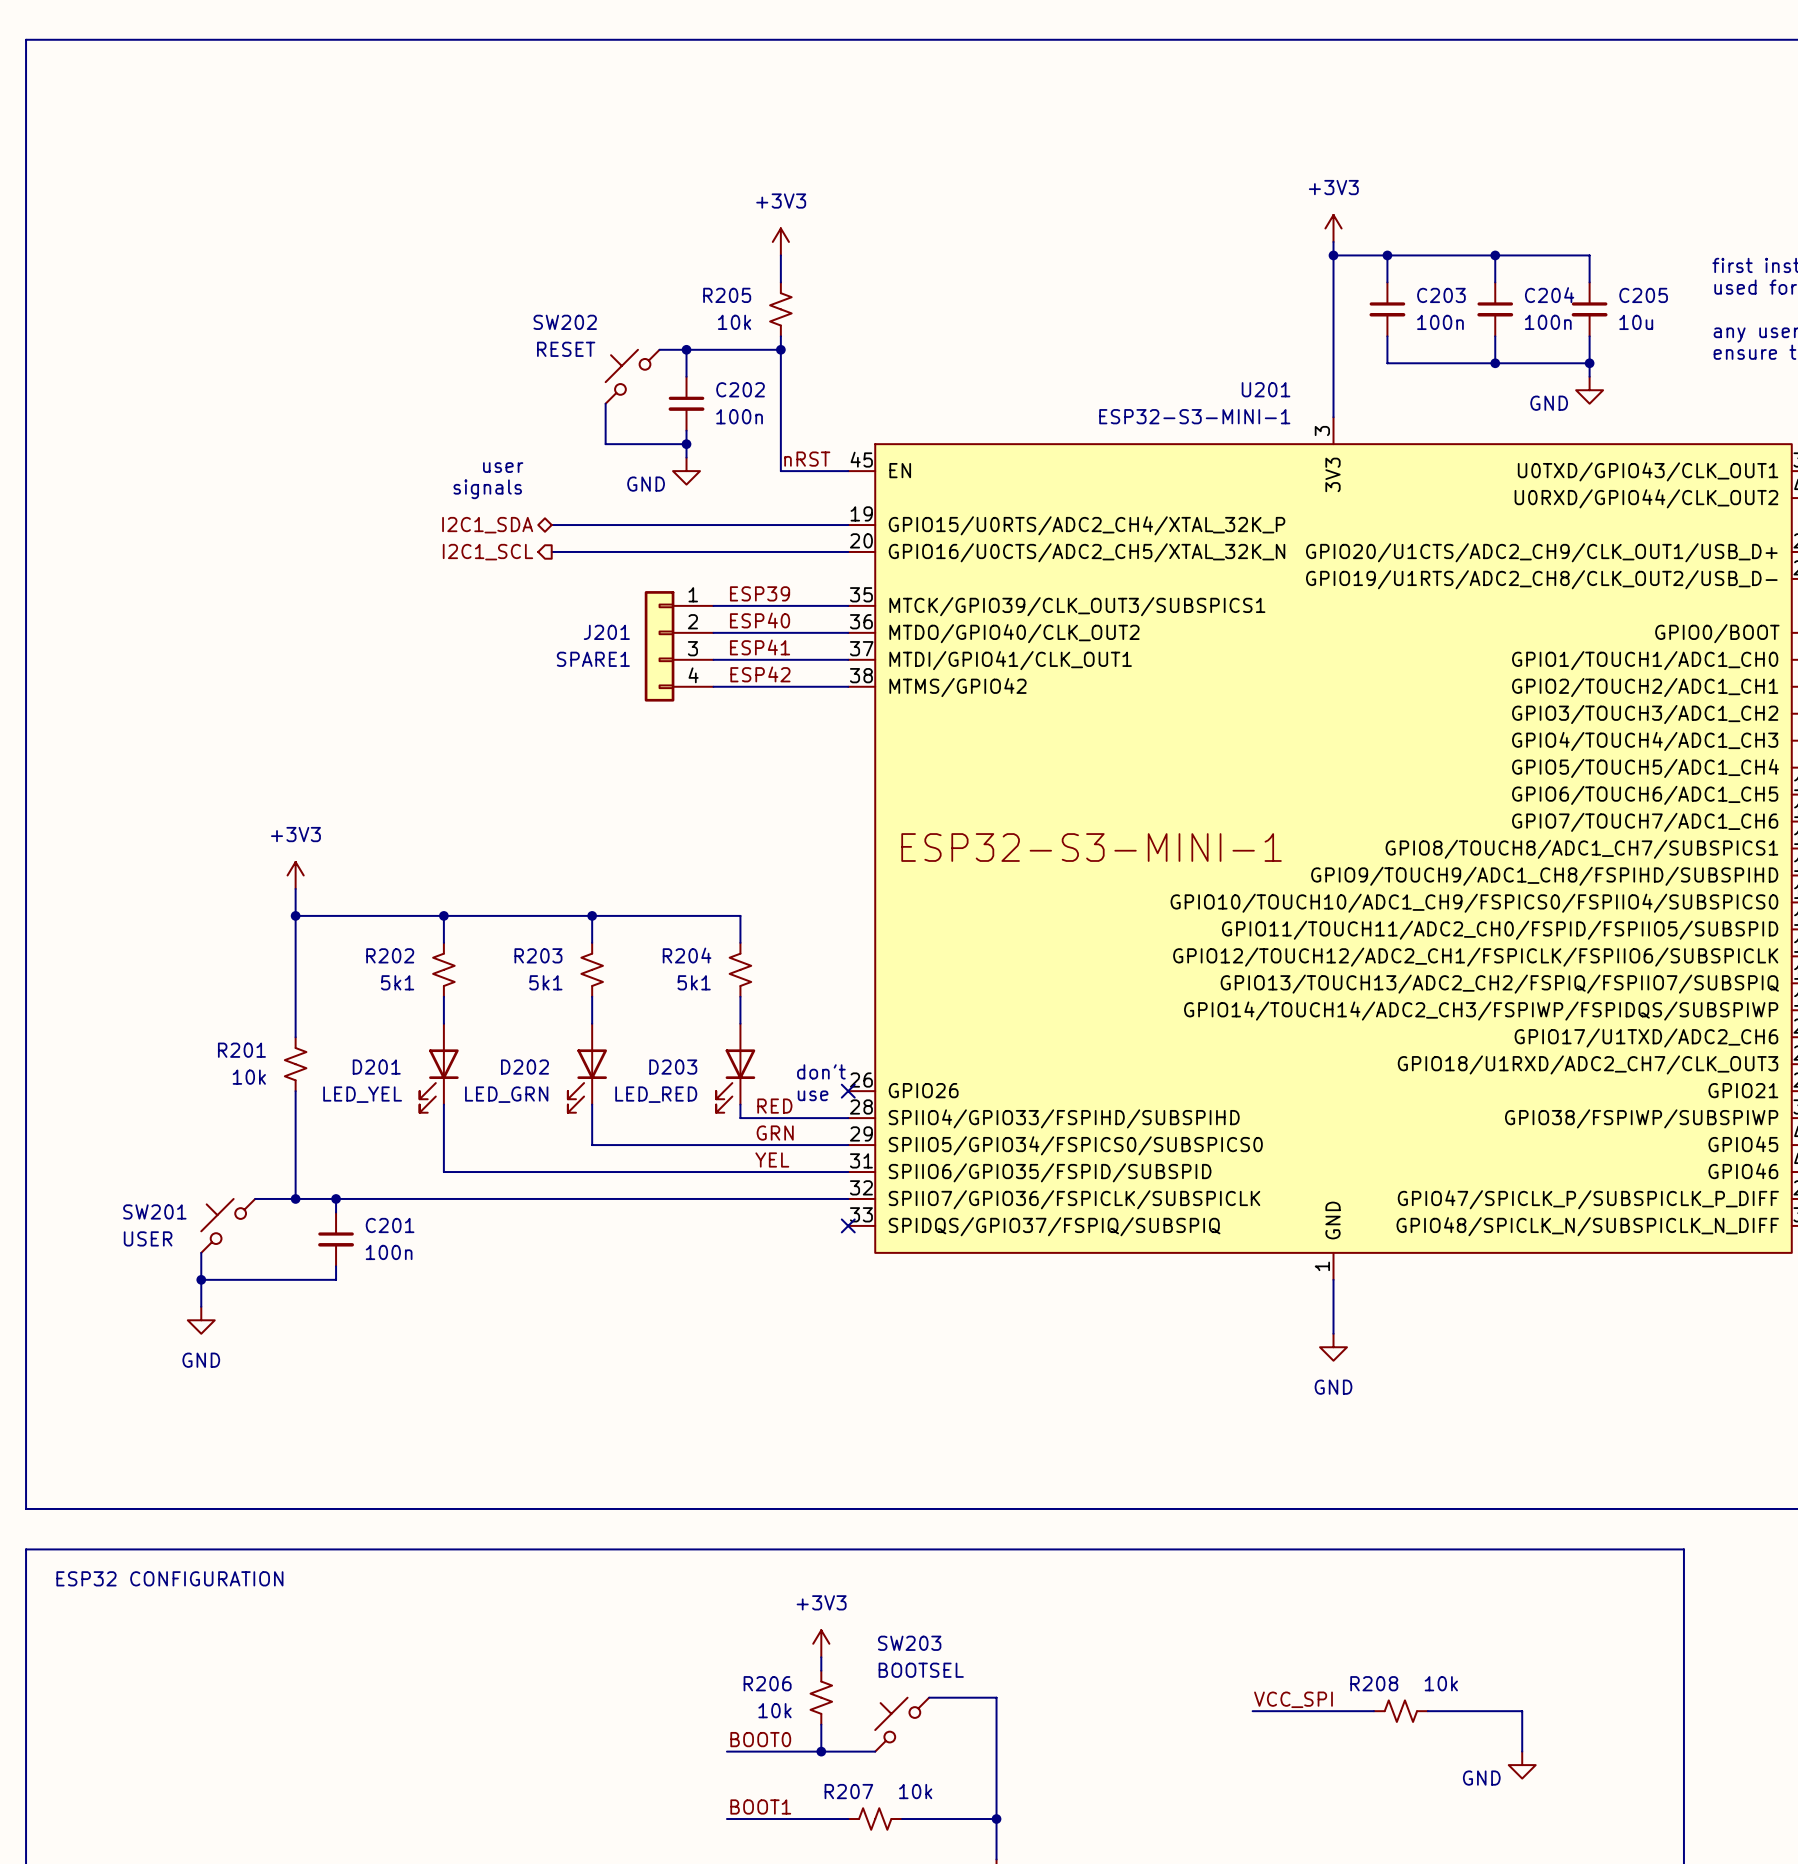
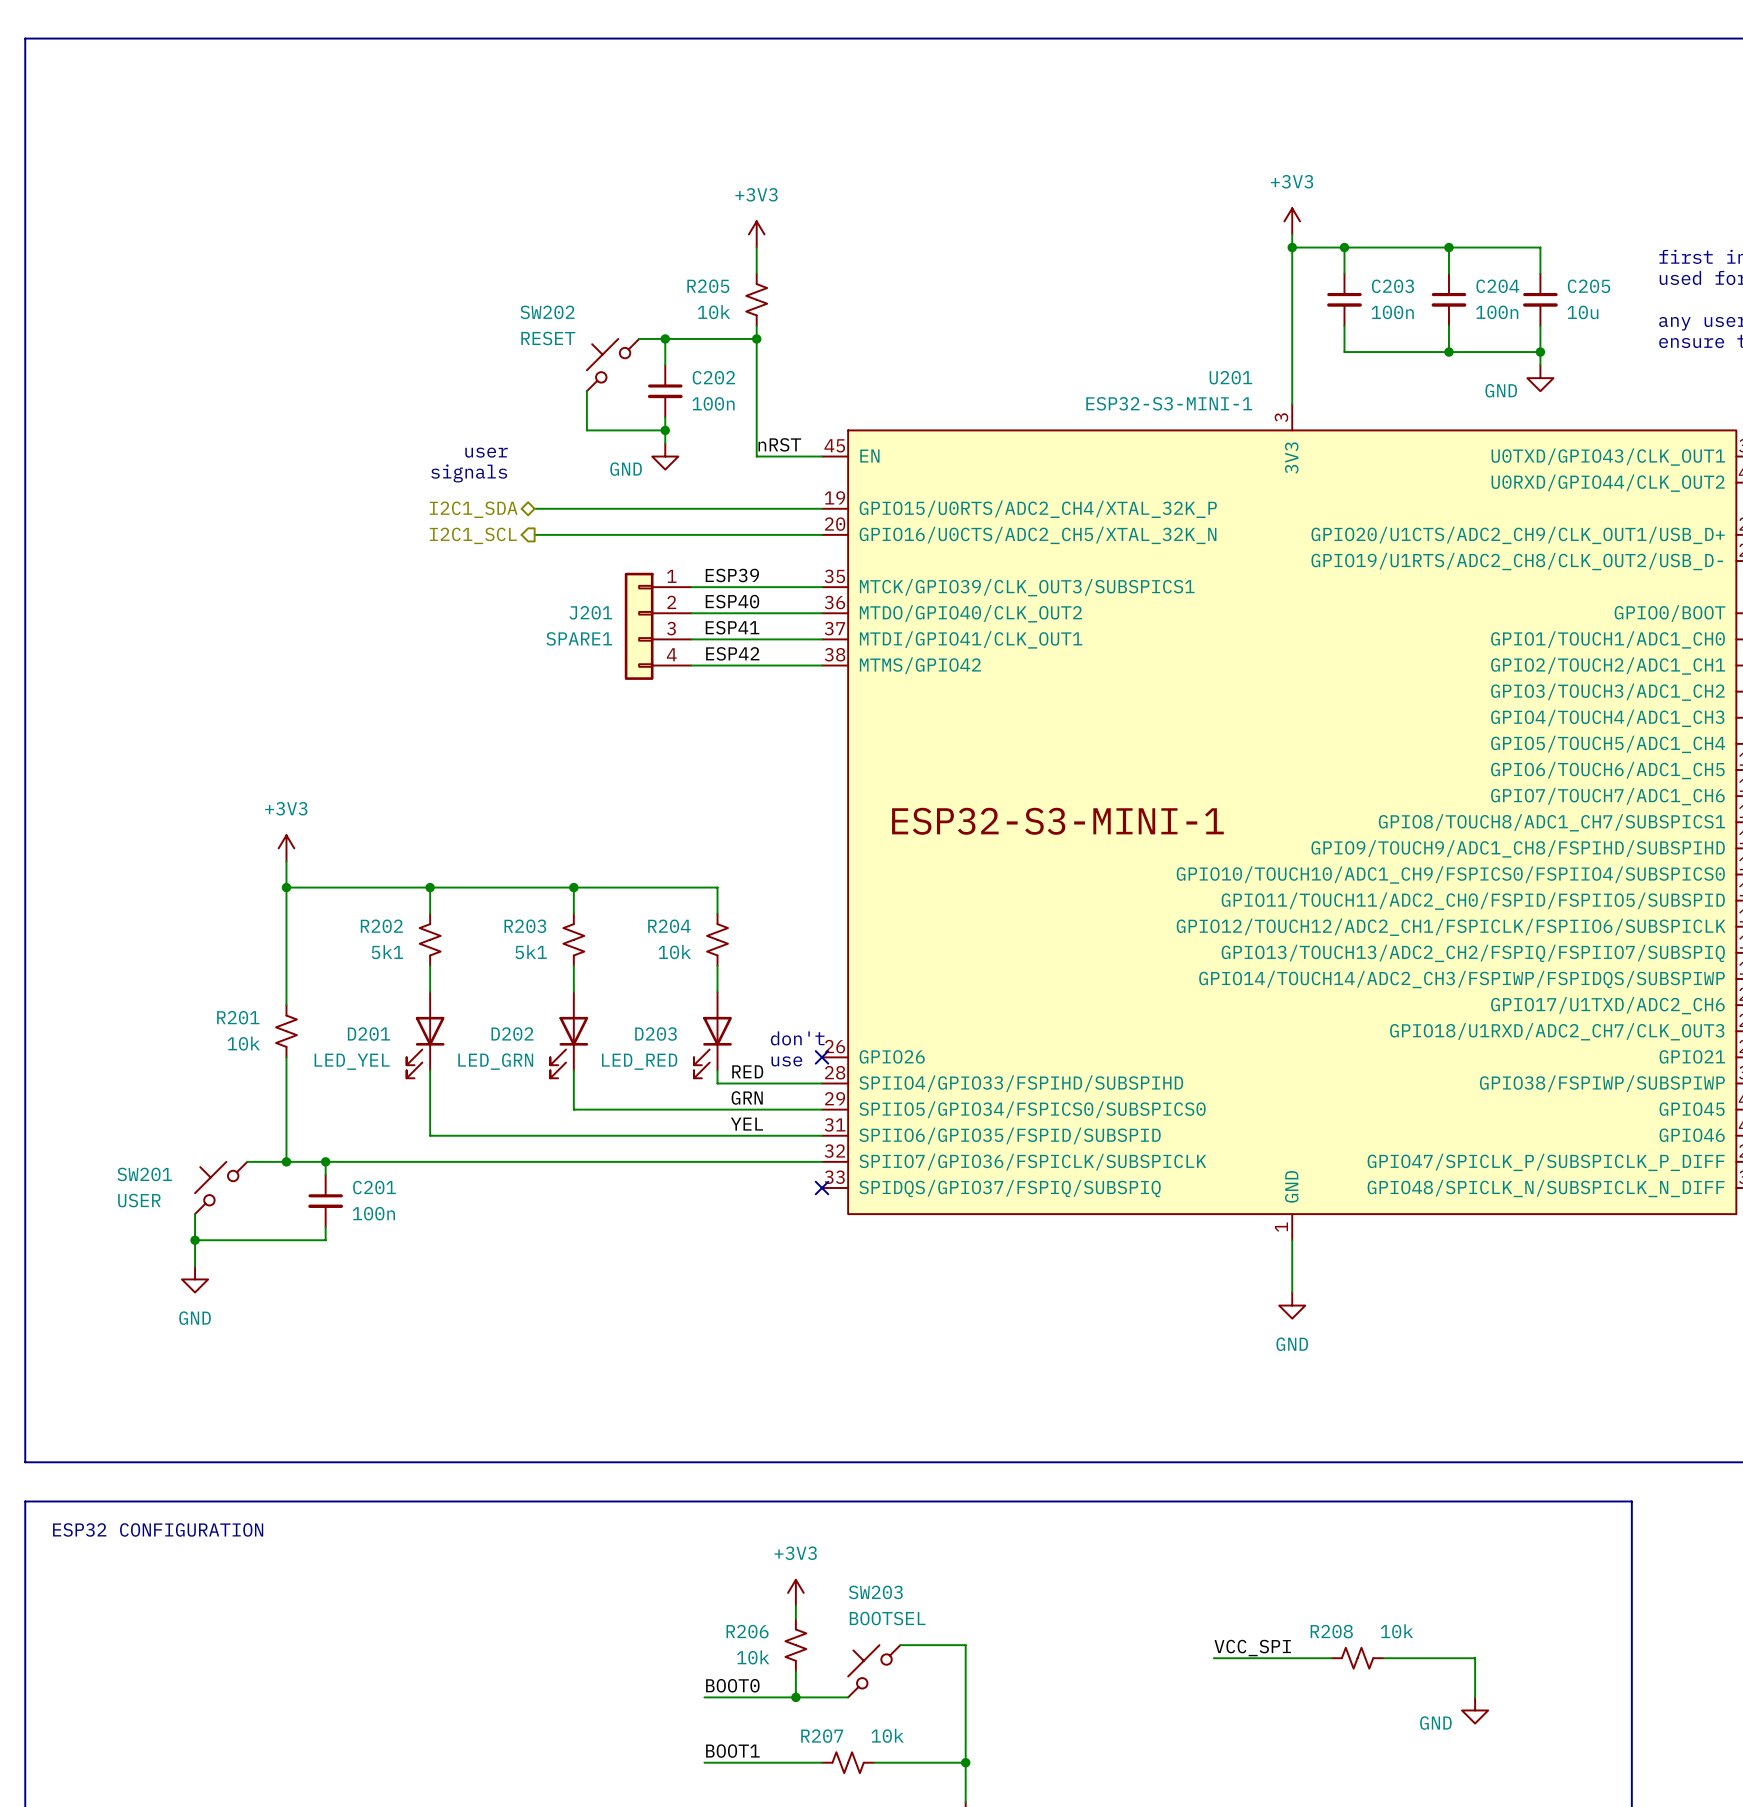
R204 flip: as is (740, 969) -> left-right (717, 939)
R204 value: 5k1 (694, 982) -> 10k (674, 952)

